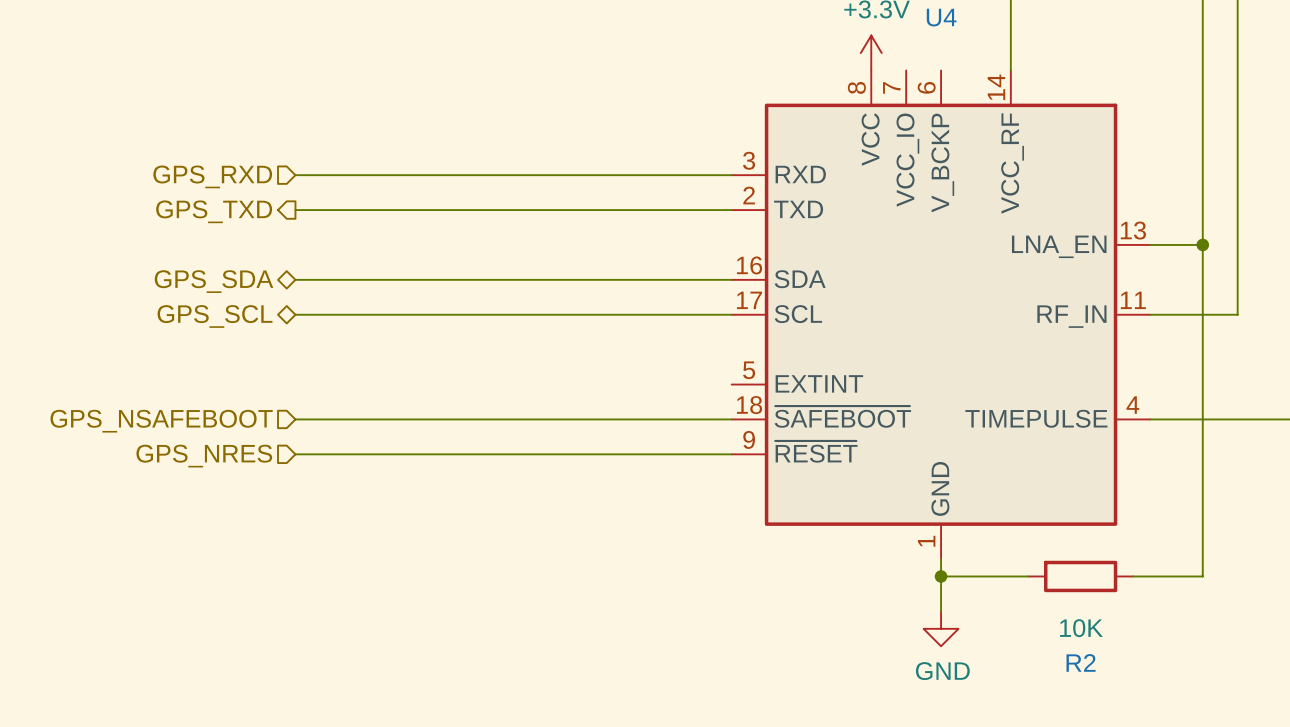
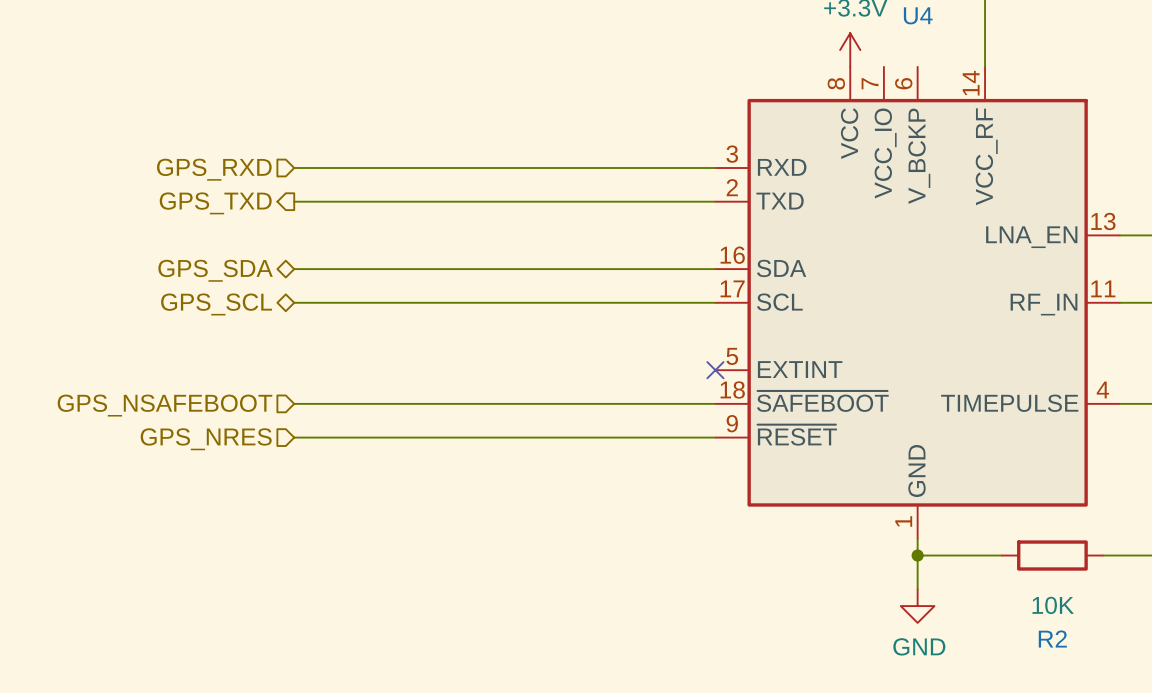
no-connect mark: none -> (715, 370)

